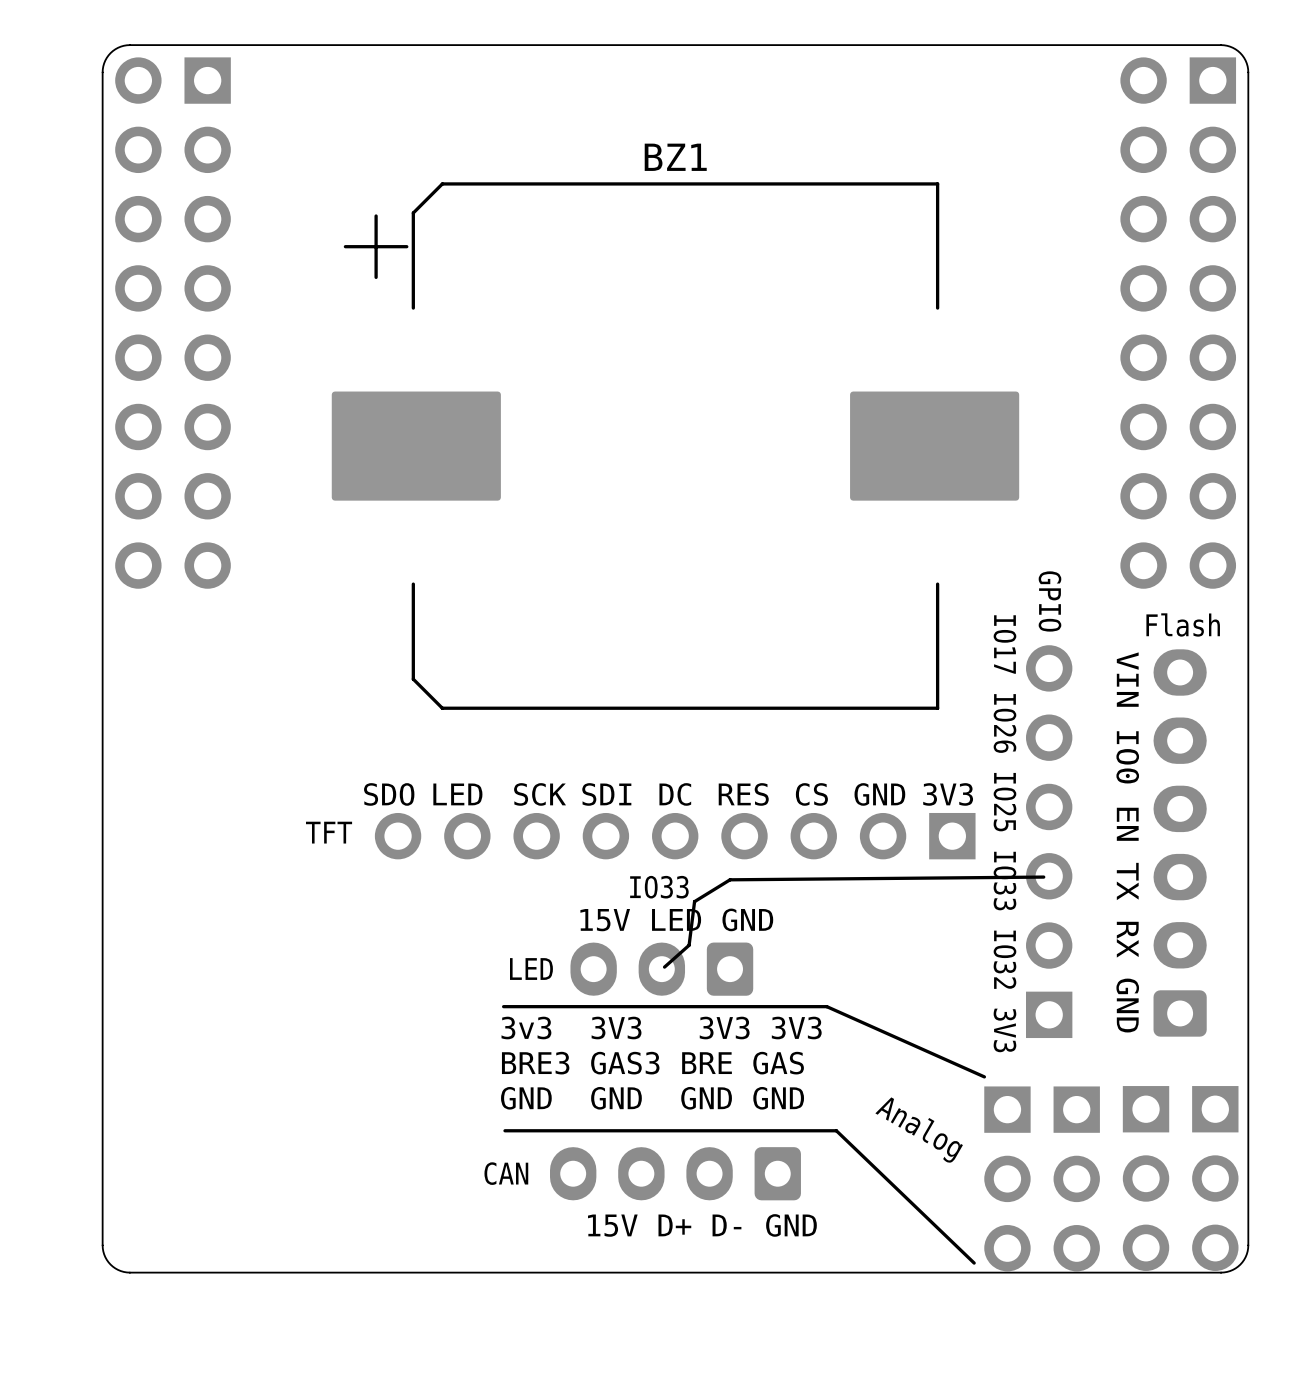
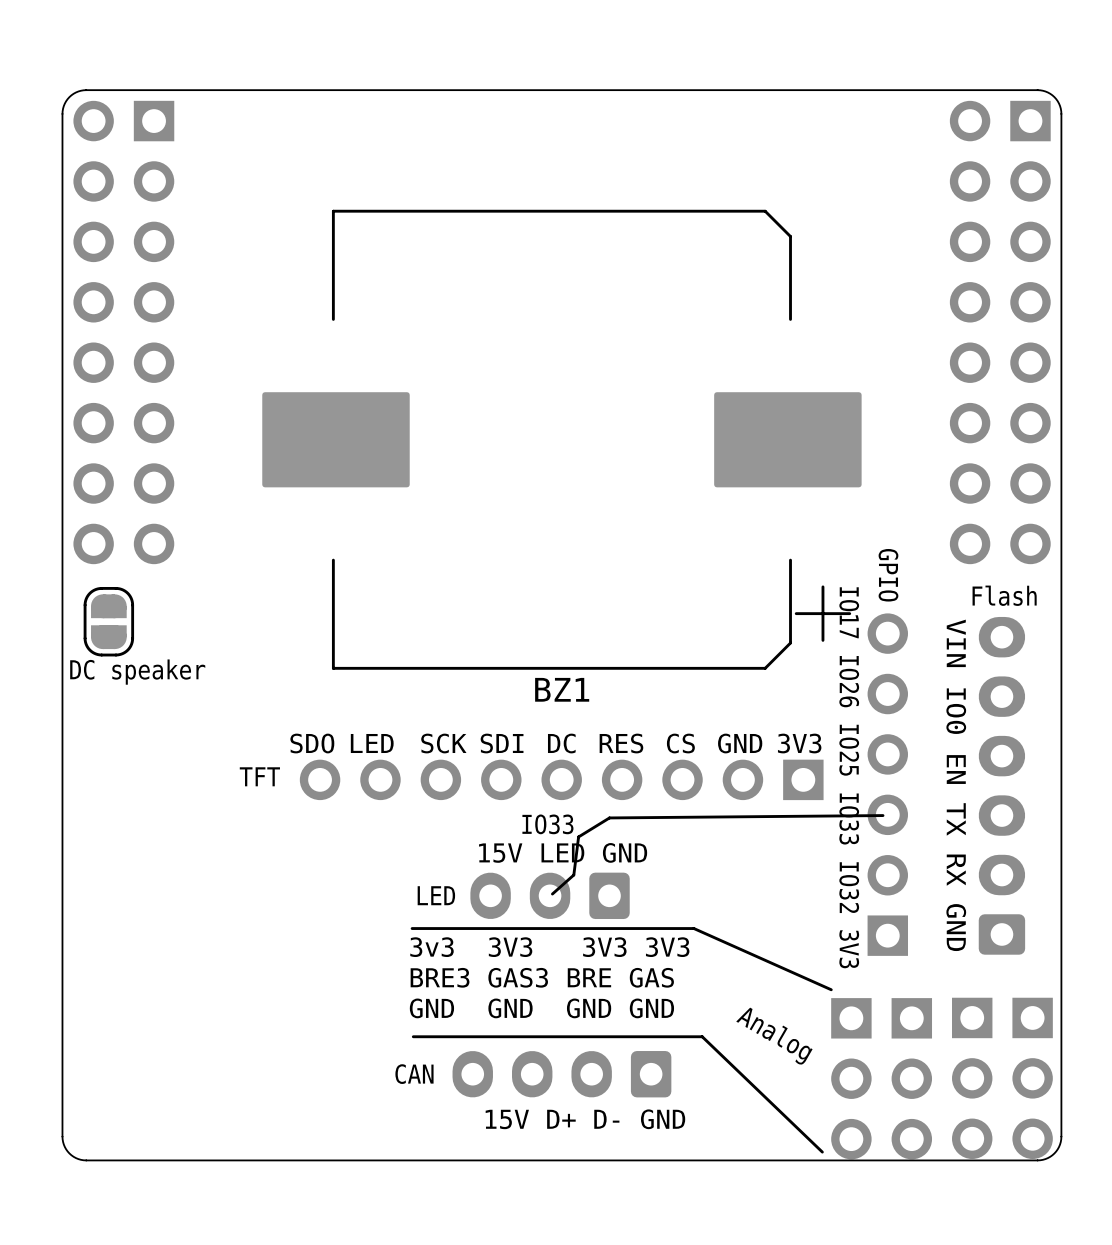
BZ1 rotation: 0° (675, 446) -> 180° (561, 439)
part: none -> (108, 621)
text: none -> DC speaker (137, 672)

